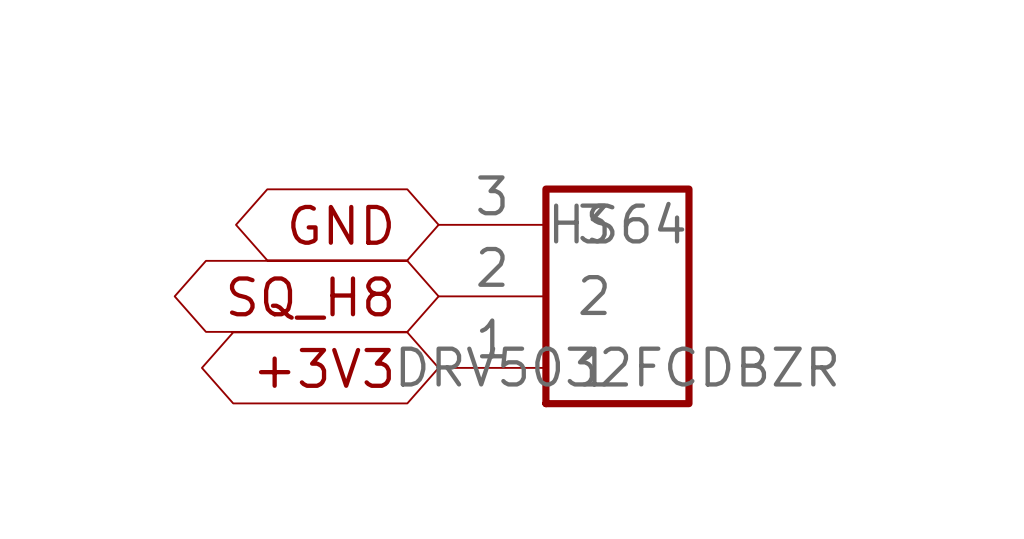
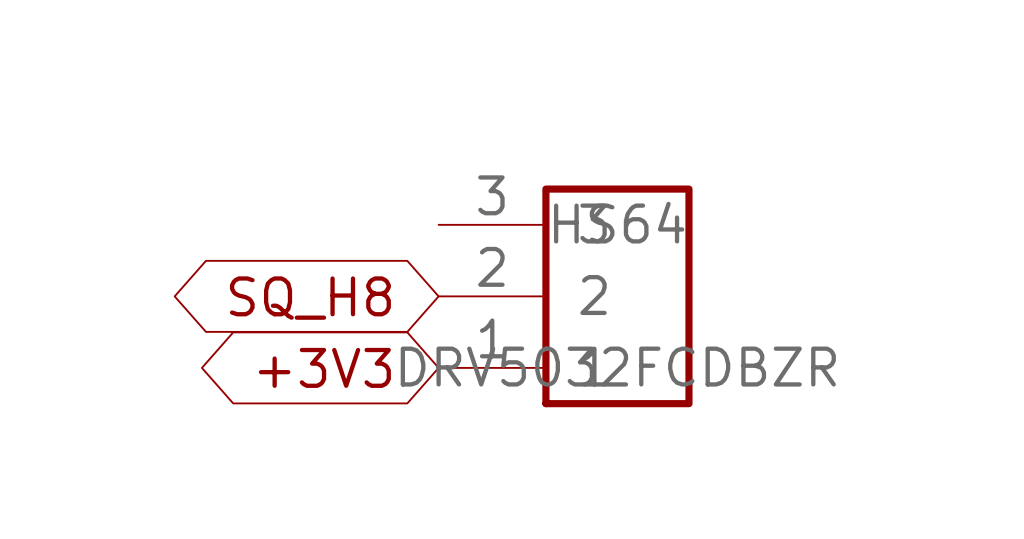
global label: GND (341, 224) -> none

